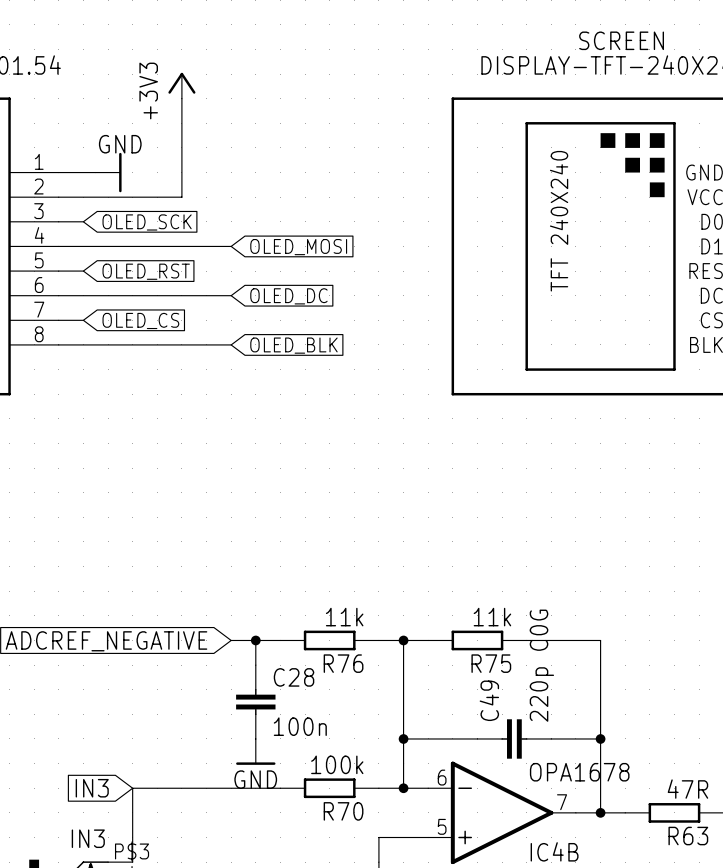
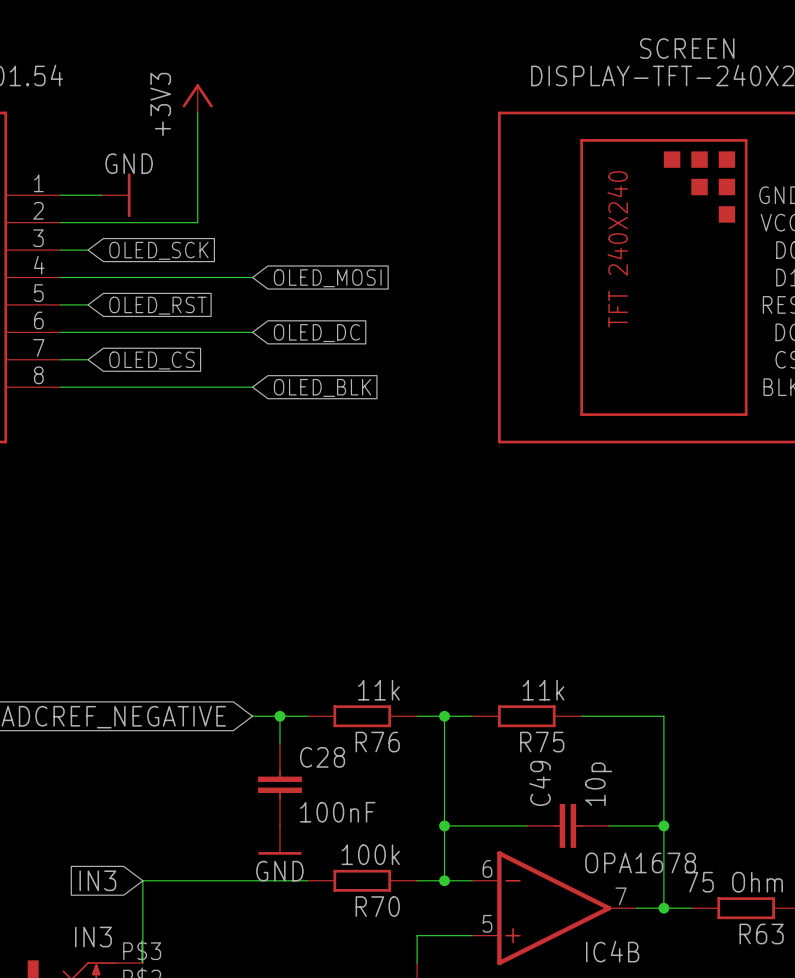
C49 value: 220p C0G (541, 665) -> 10p (598, 784)
C28 value: 100n (300, 726) -> 100nF (337, 812)
R63 value: 47R (687, 789) -> 75 Ohm (734, 882)

